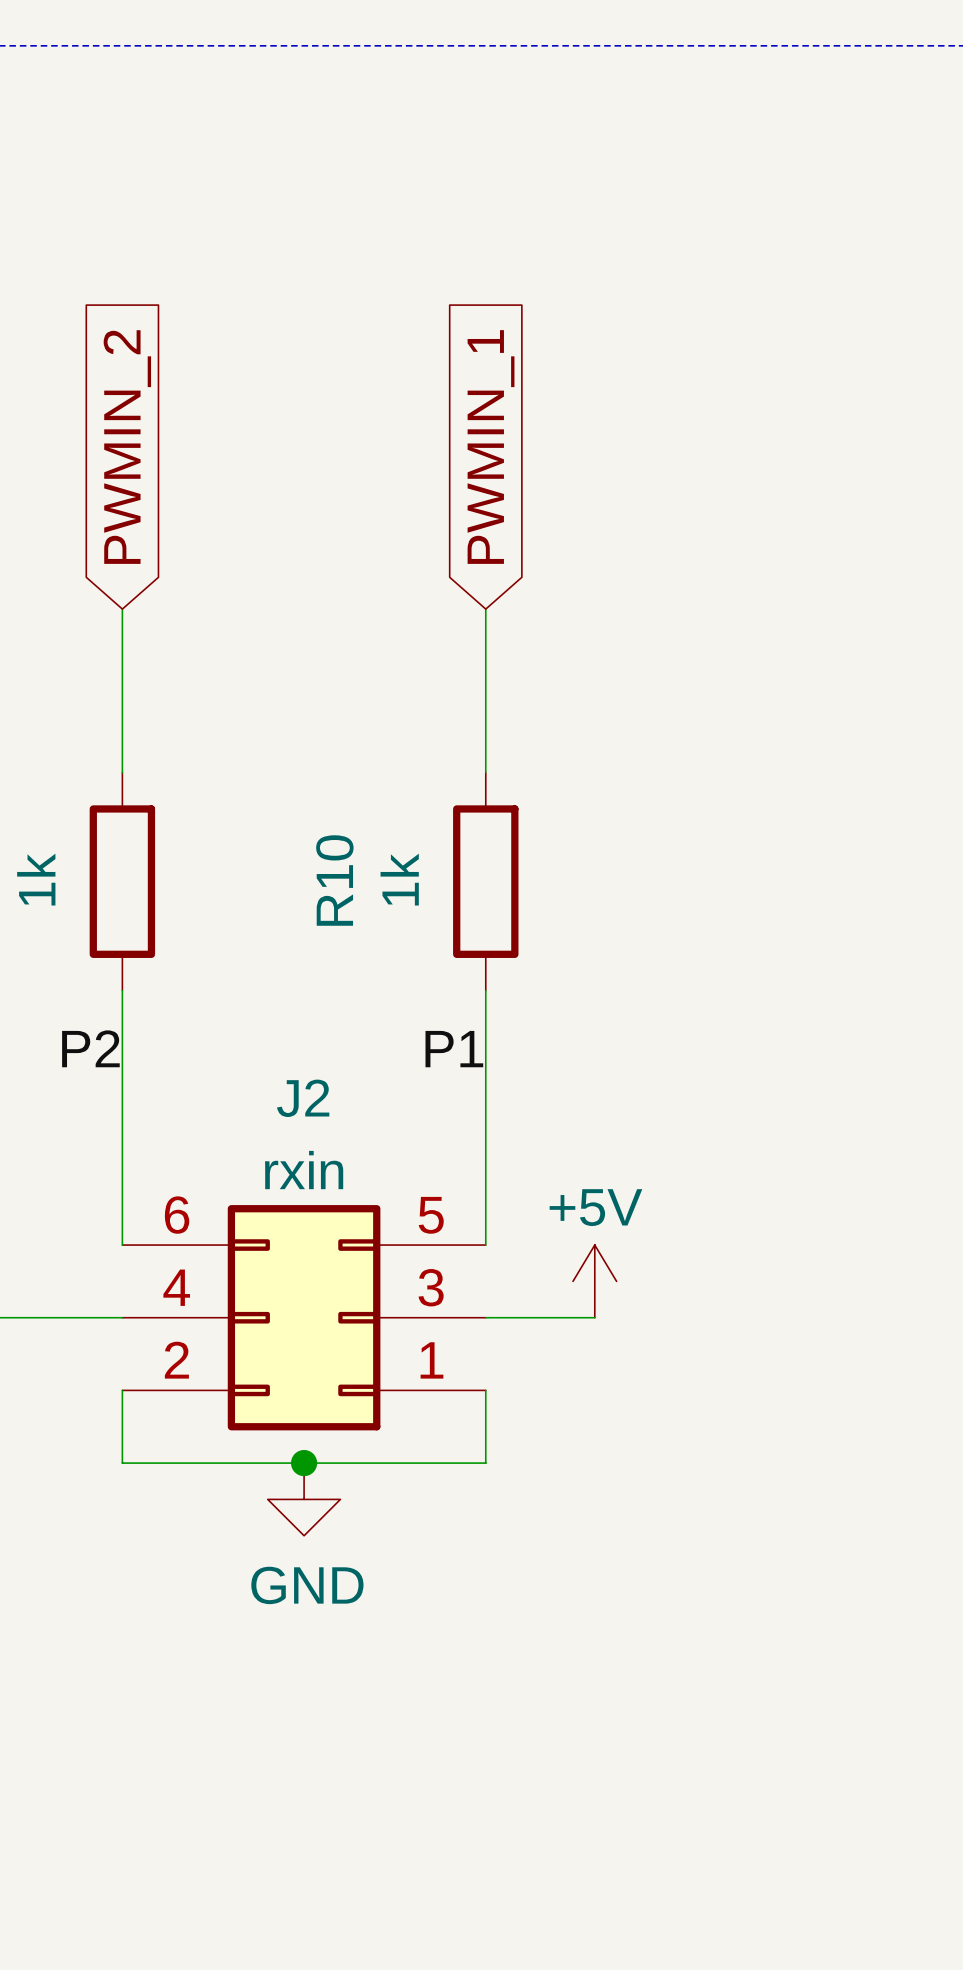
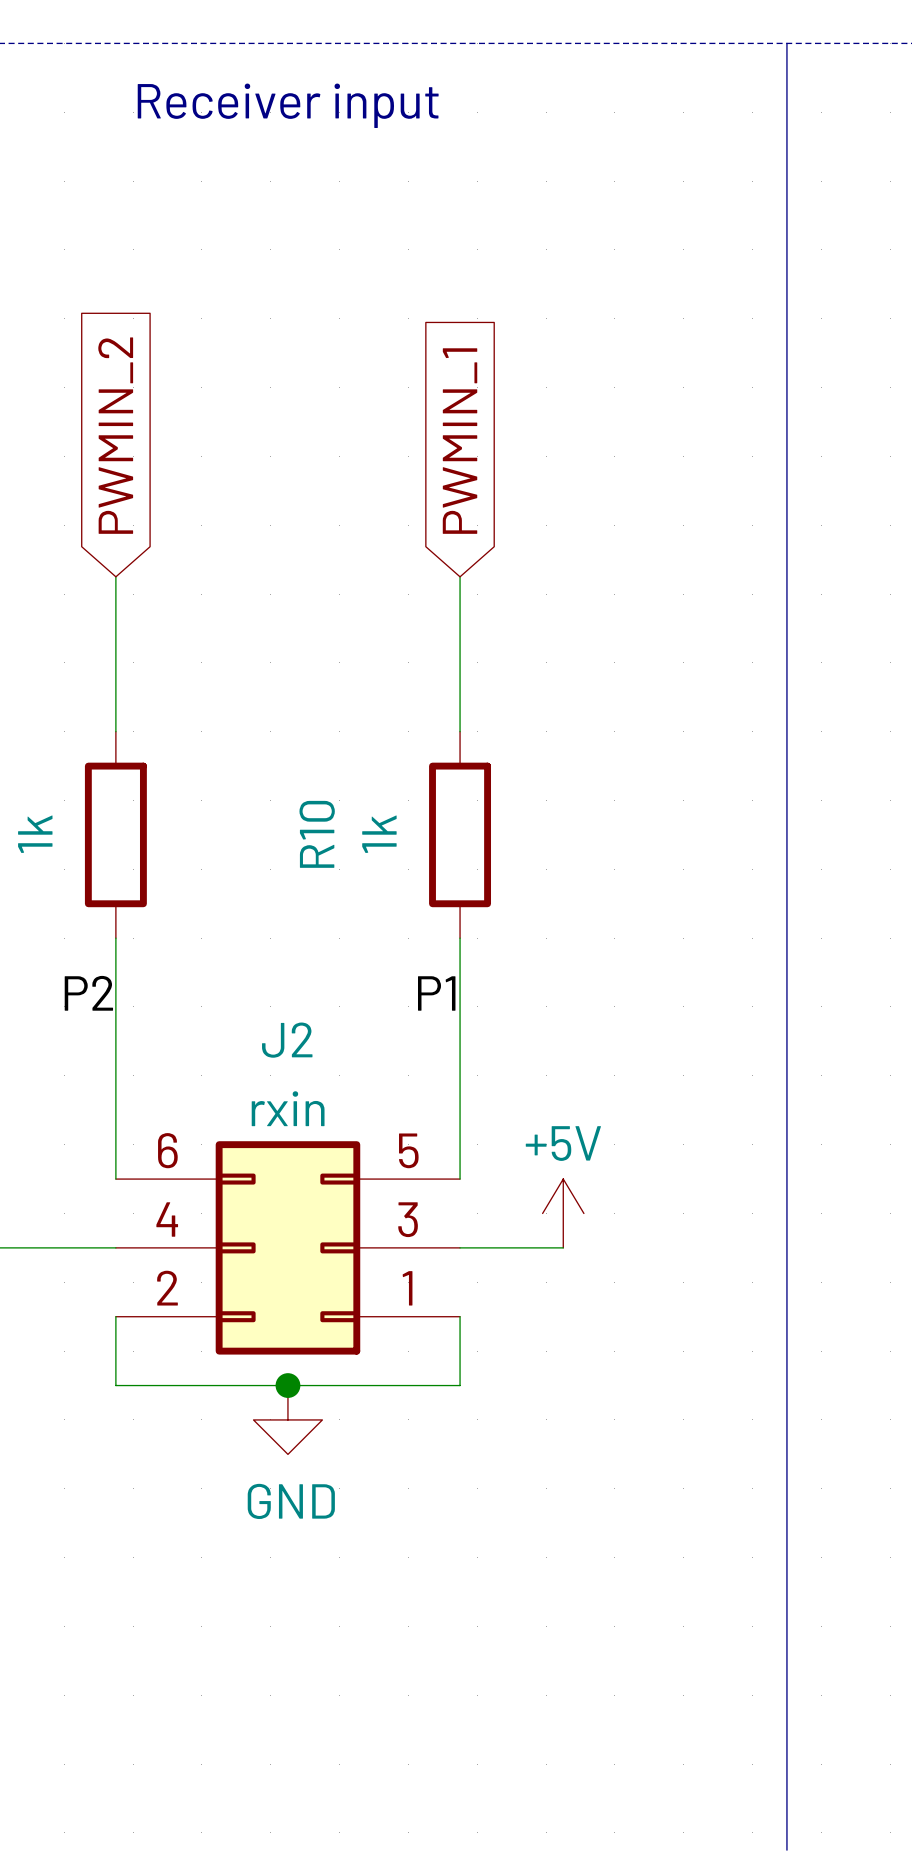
line: none -> (786, 43) (786, 1850)
text: none -> Receiver input (288, 105)

